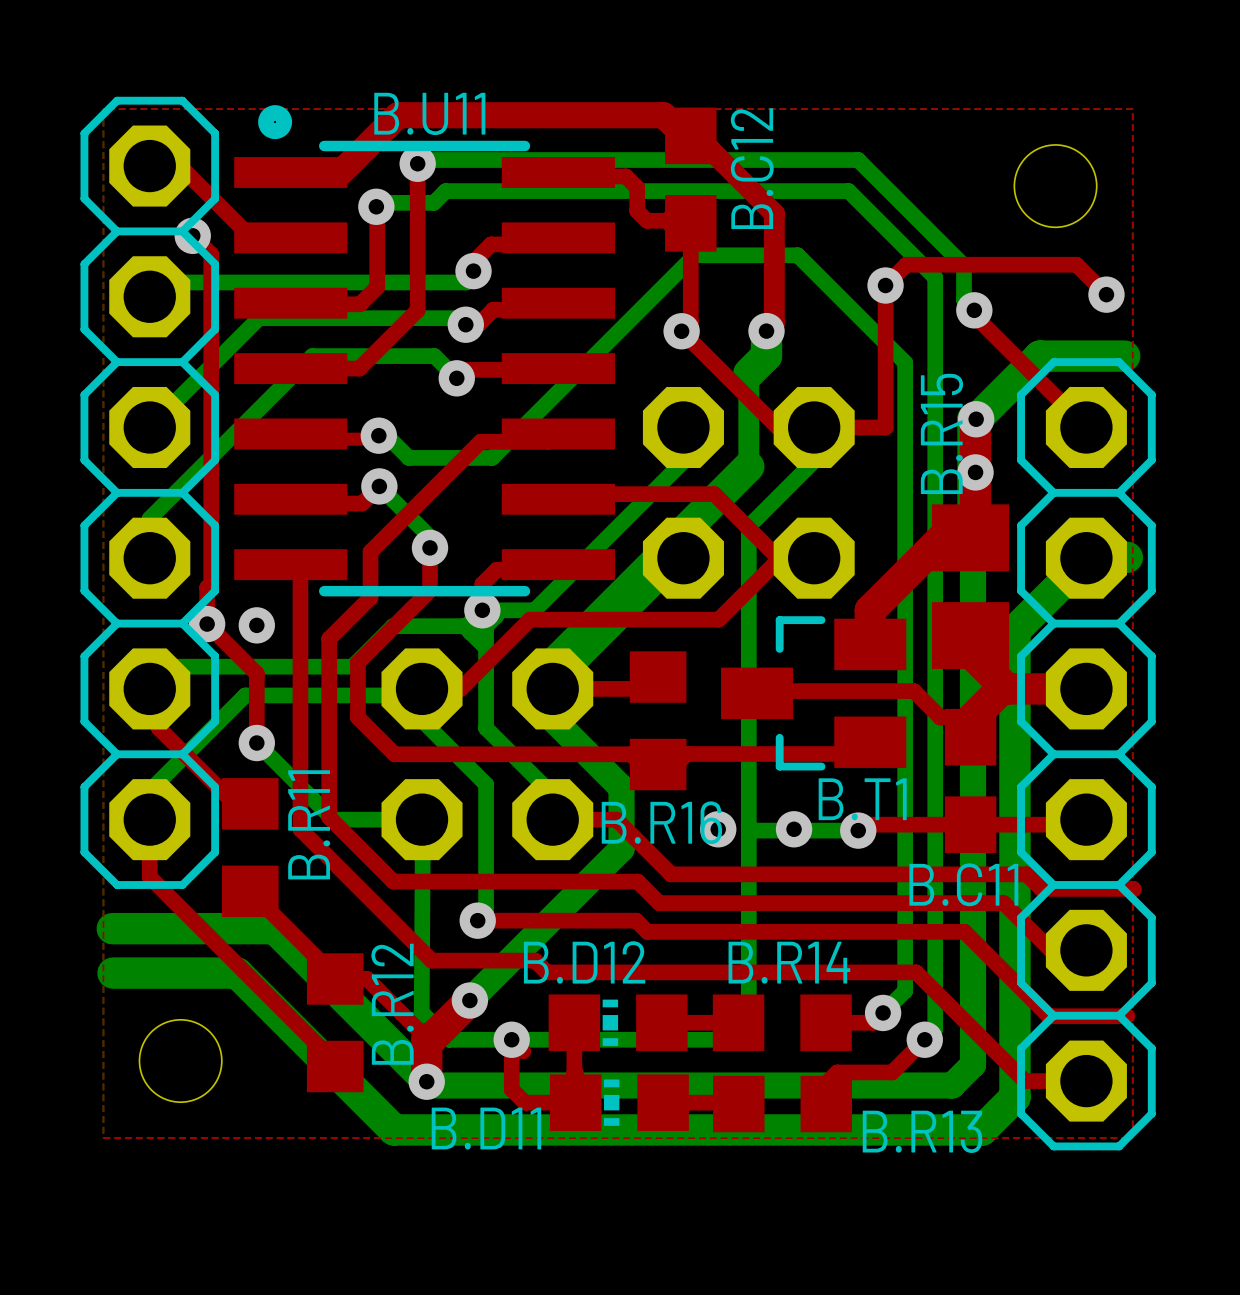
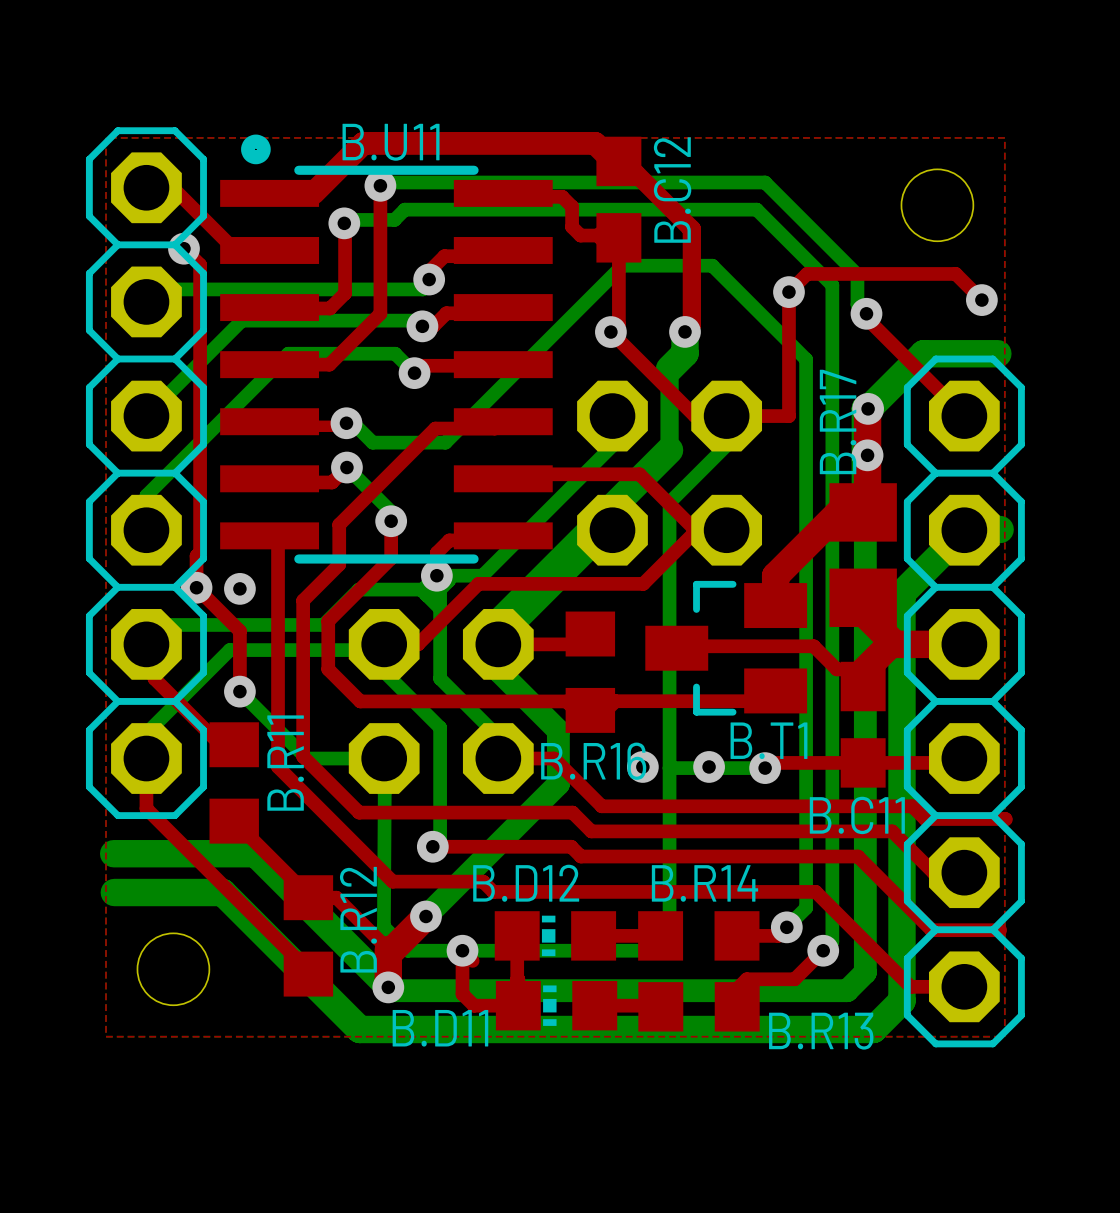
B.R15 name: B.R15 (941, 433) -> B.R17 (838, 421)

